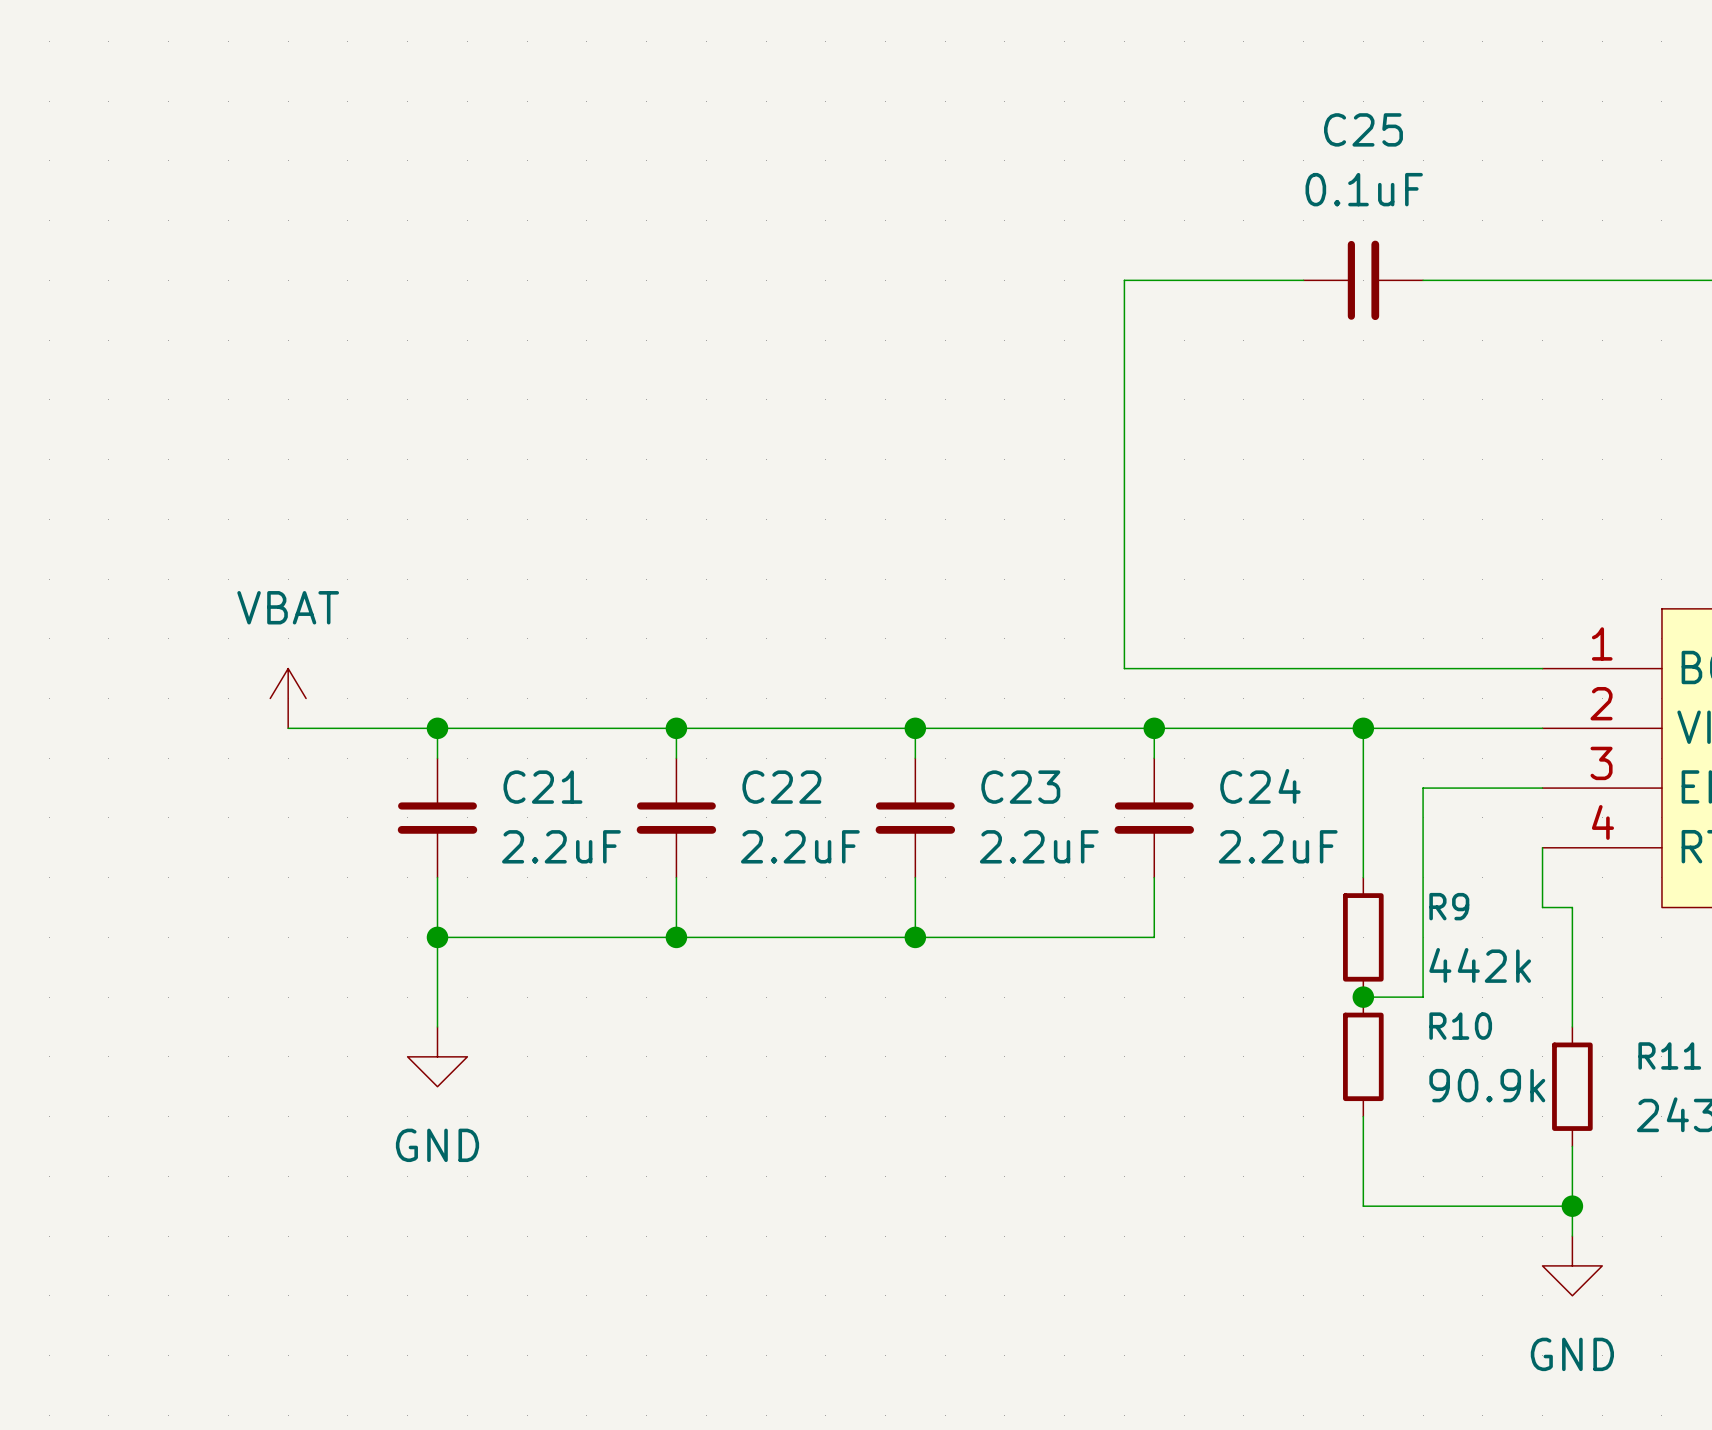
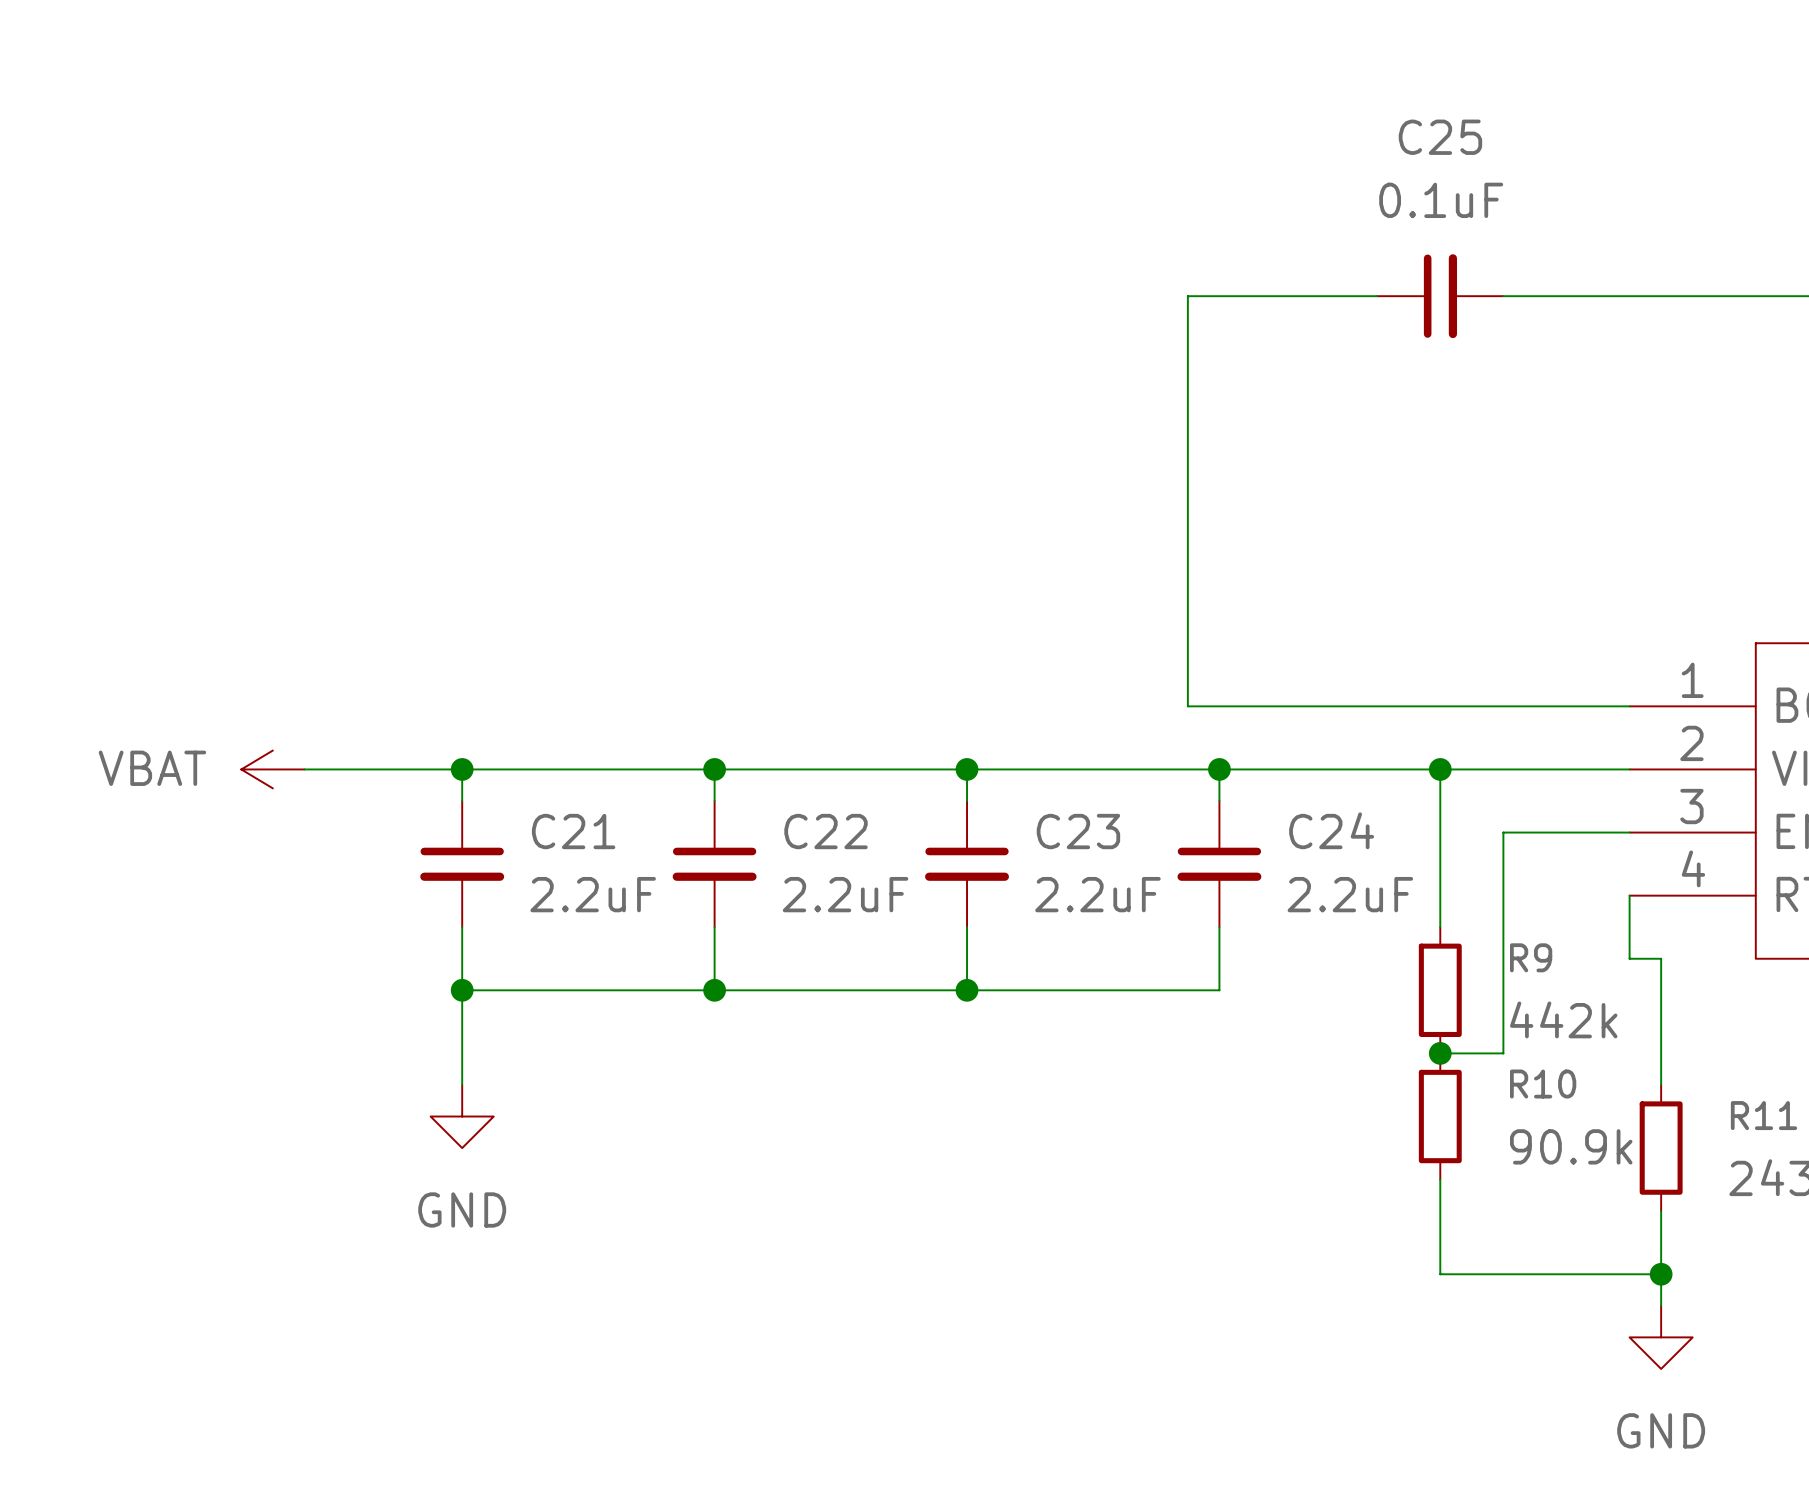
power symbol rotation: 0° (288, 698) -> 90° counterclockwise (272, 769)
power symbol position: VBAT (288, 698) -> VBAT (272, 769)

